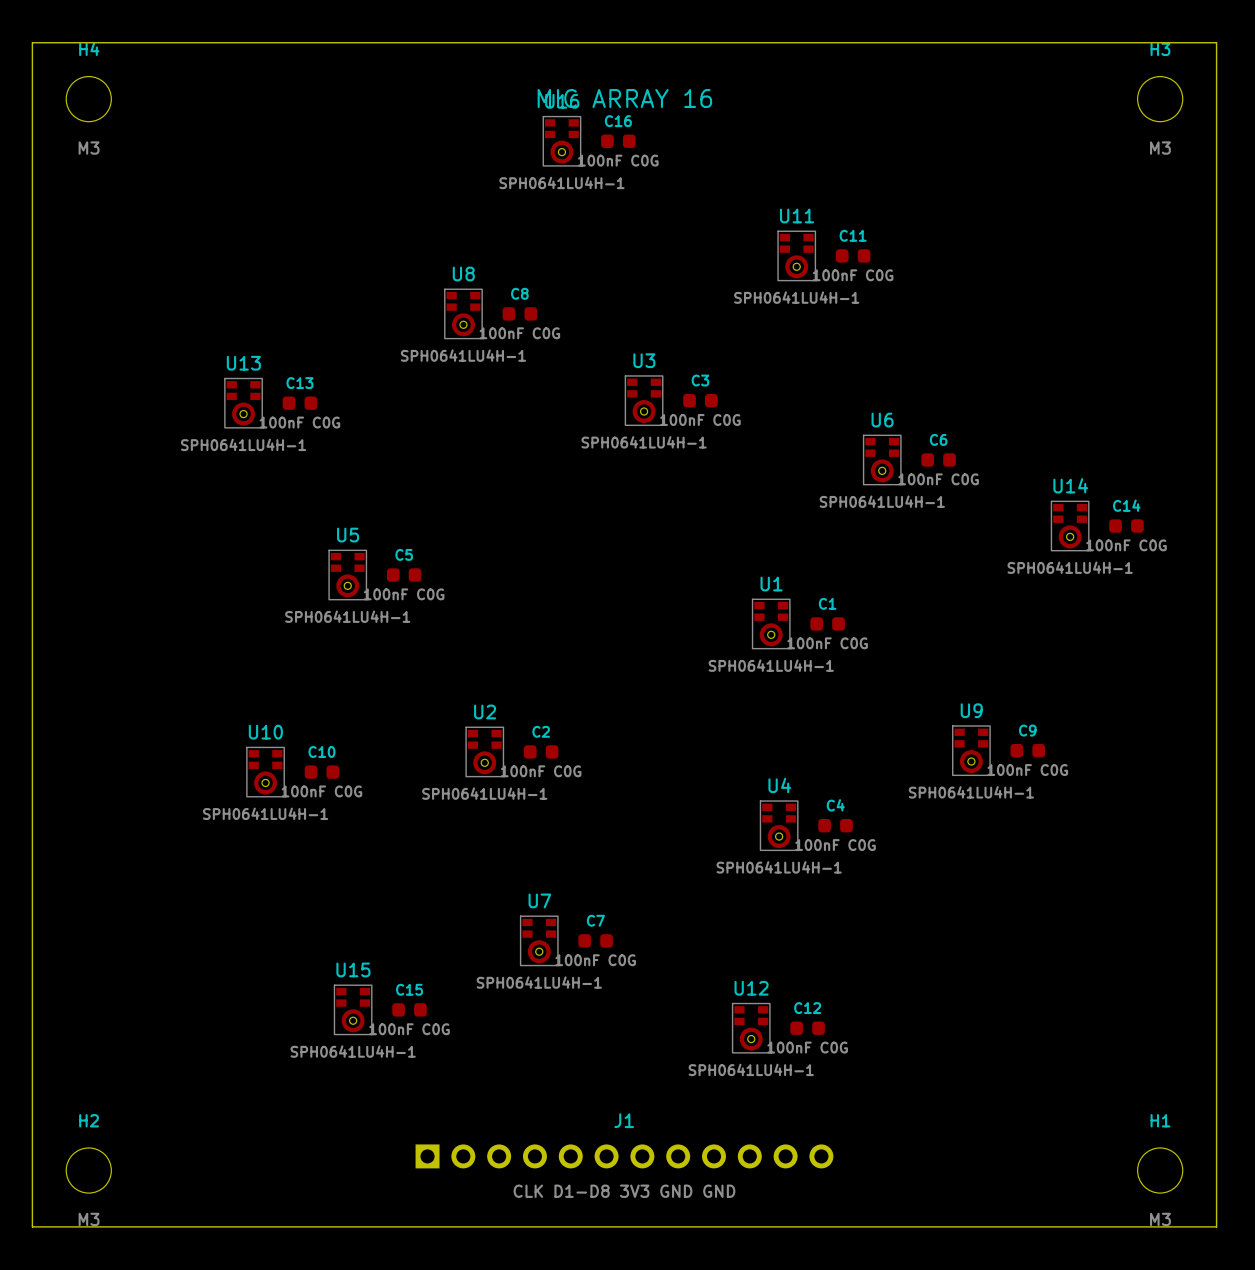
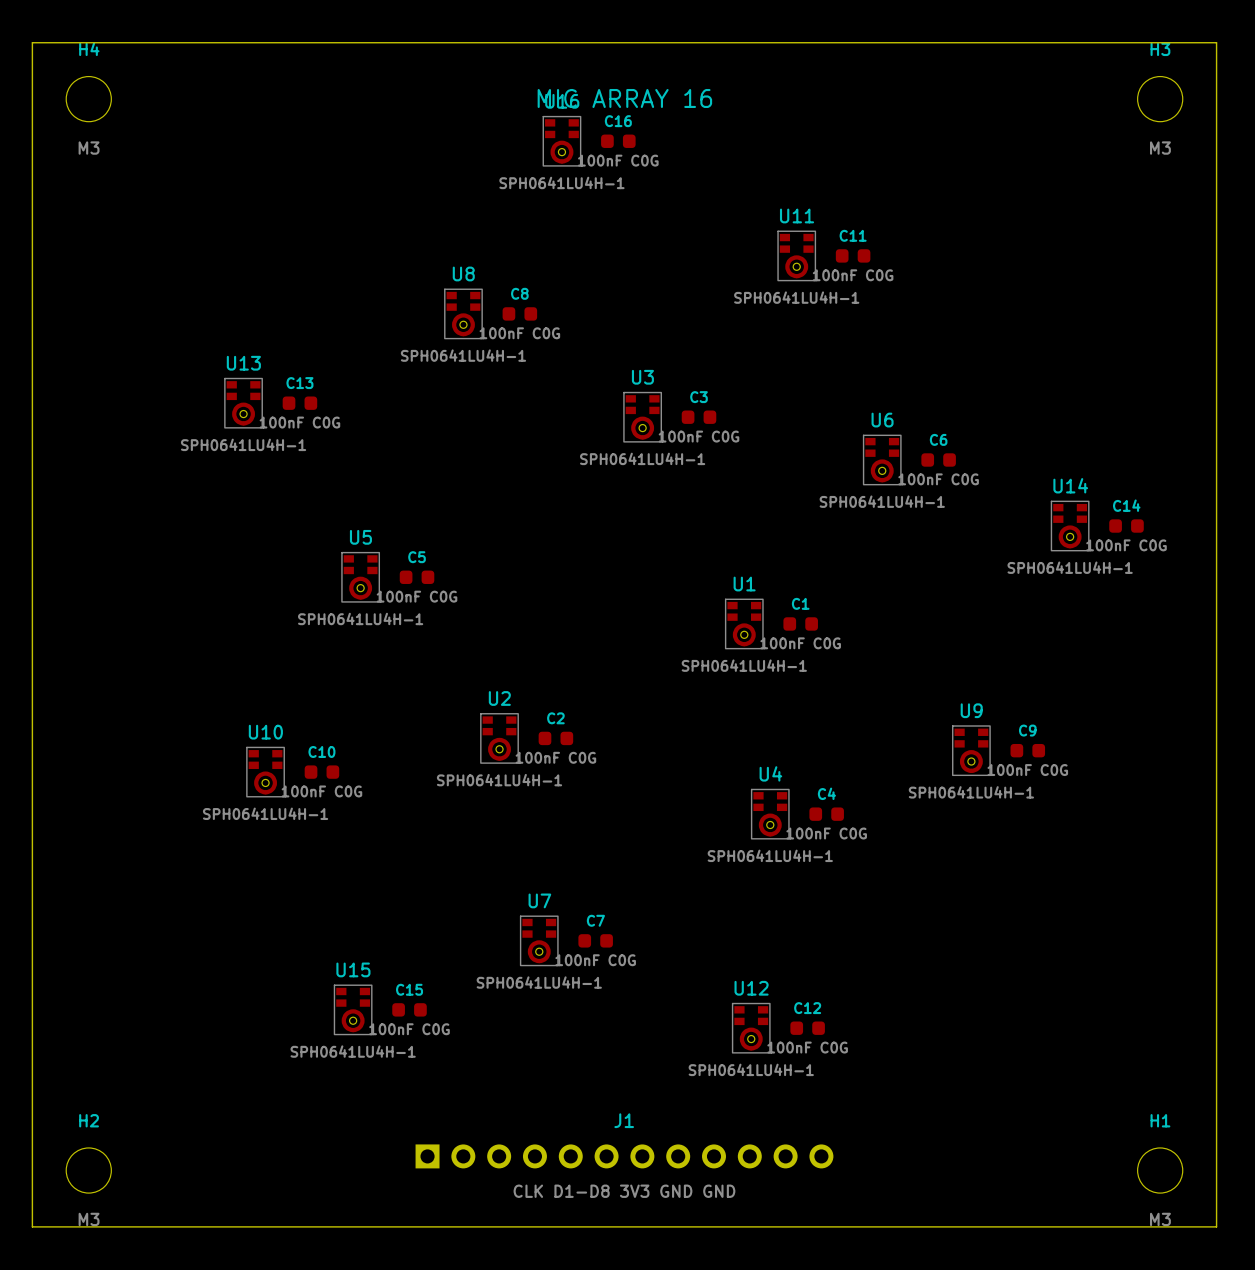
U3 position: (644, 400) -> (642, 417)
C3 position: (700, 400) -> (699, 417)
U5 position: (347, 575) -> (360, 577)
C5 position: (404, 575) -> (417, 577)
U1 position: (771, 623) -> (744, 623)
C1 position: (827, 623) -> (800, 623)
U2 position: (484, 751) -> (499, 738)
C2 position: (541, 751) -> (555, 738)
U4 position: (779, 825) -> (770, 814)
C4 position: (835, 825) -> (826, 814)

